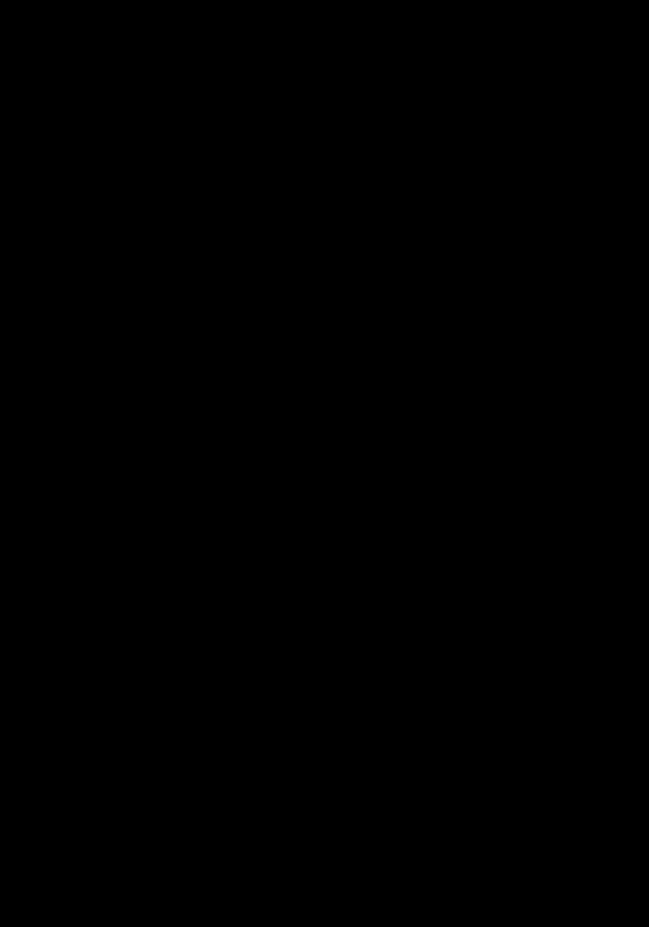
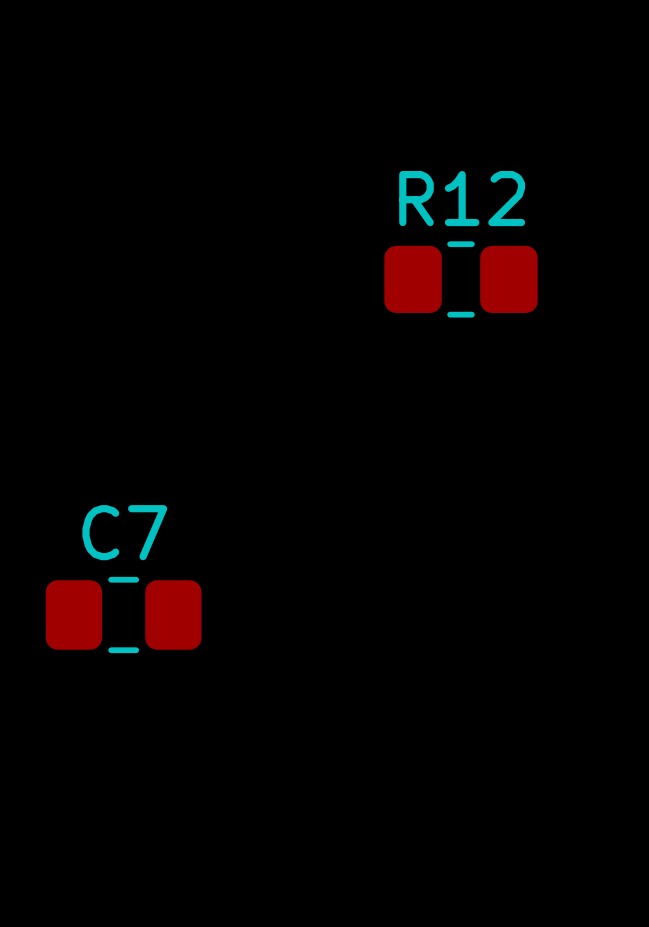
R12: none -> (461, 279)
C7: none -> (123, 614)

